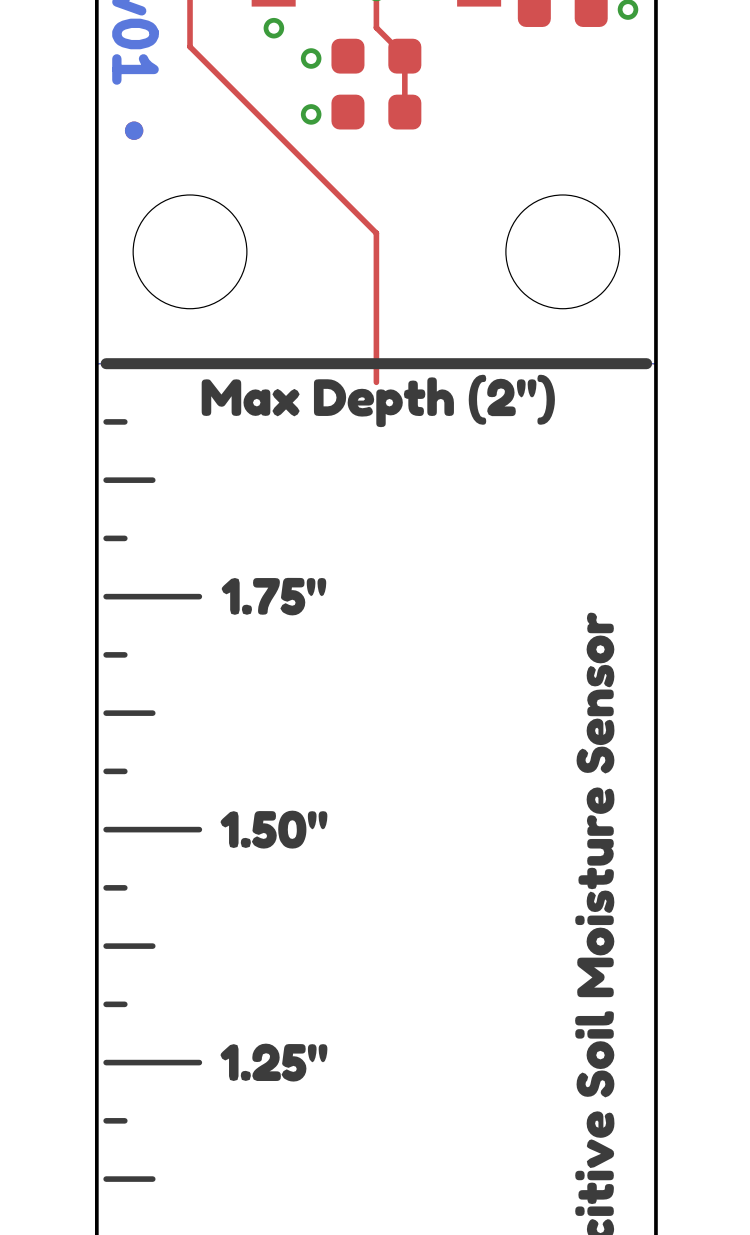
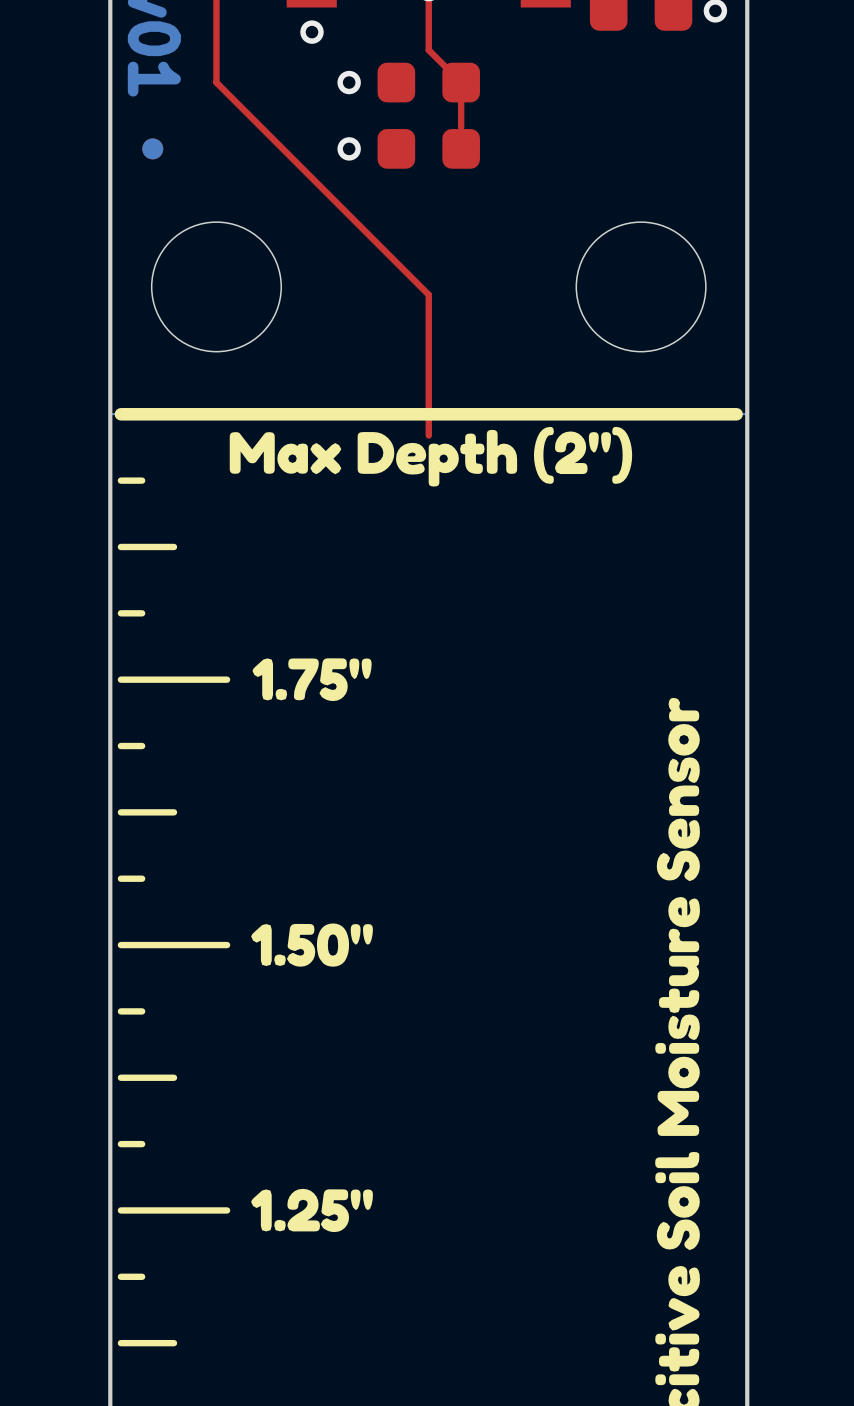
top track: (376, 27) (395, 47) (404, 47) -> (428, 31) (428, 50) (461, 82)
top track: (190, 46) (376, 233) (376, 258) -> (216, 53) (216, 82) (428, 294)
part position: (376, 56) -> (428, 82)
via position: (311, 58) -> (349, 82)
part position: (376, 112) -> (428, 148)
via position: (311, 114) -> (349, 148)

